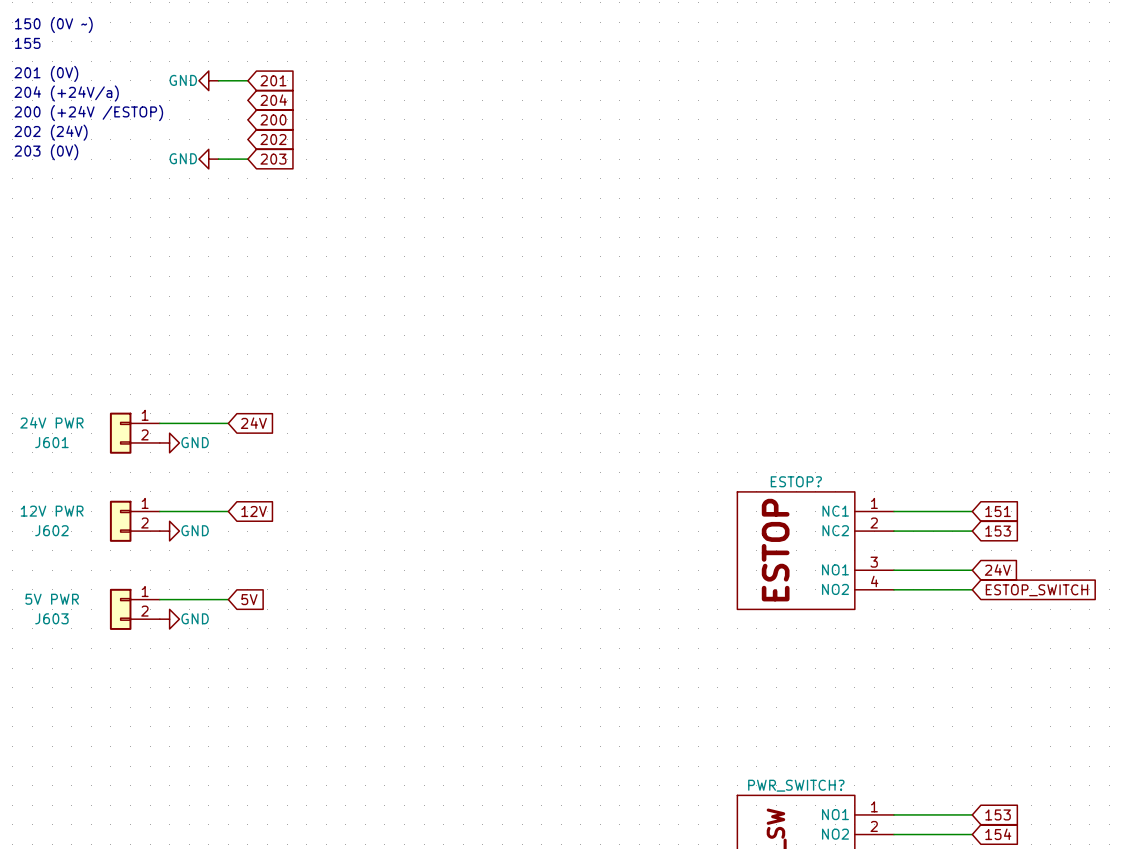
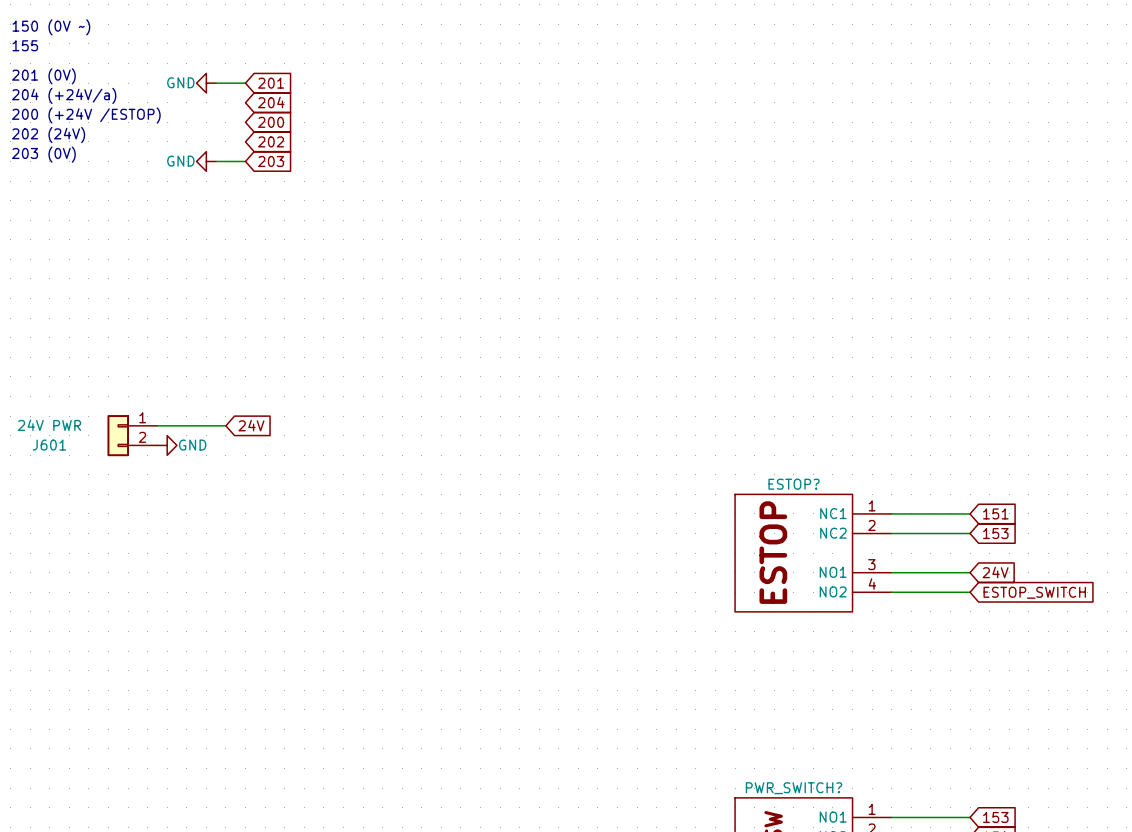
wire: (159, 511) (228, 511) -> none
global label: 12V (254, 511) -> none
J602: 12V PWR (134, 521) -> none
power symbol: GND (169, 531) -> none
wire: (159, 599) (228, 599) -> none
global label: 5V (249, 599) -> none
J603: 5V PWR (134, 609) -> none
power symbol: GND (169, 619) -> none

